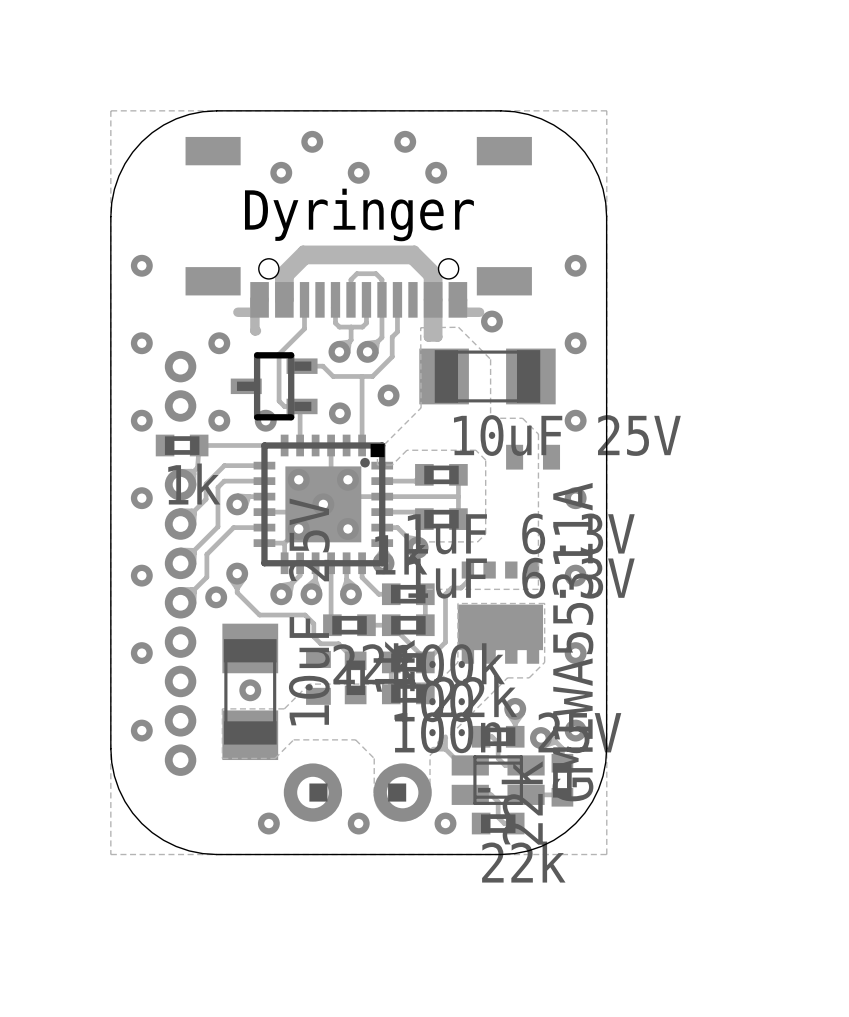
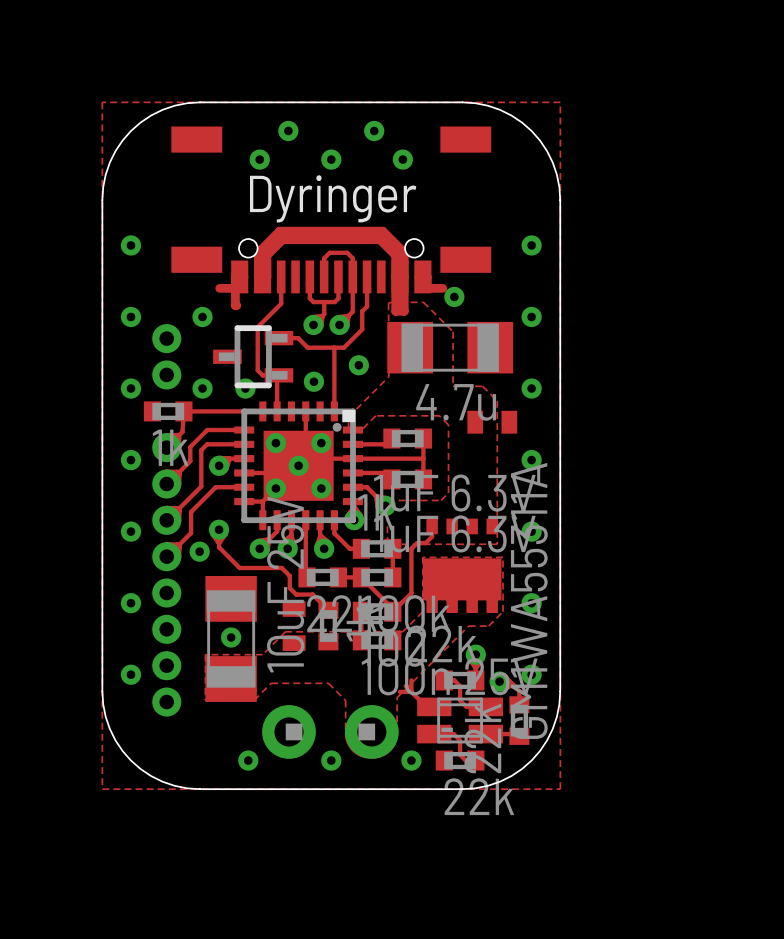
part value: 10uF 25V (567, 435) -> 4.7u (456, 402)

